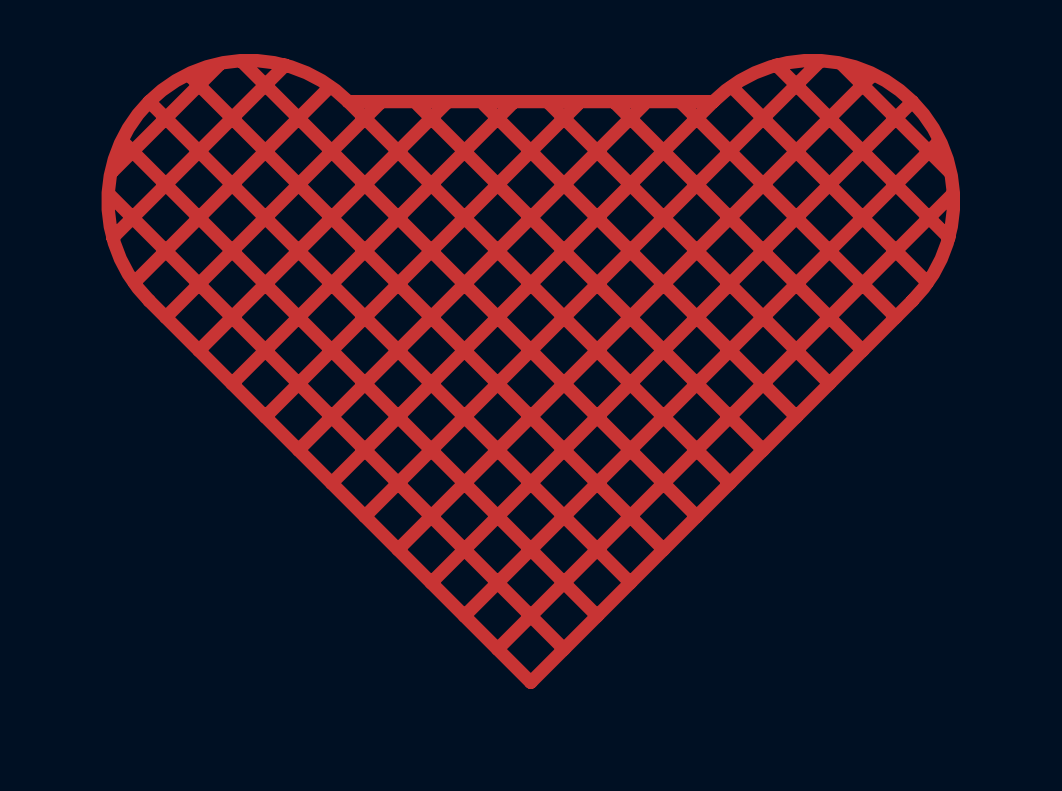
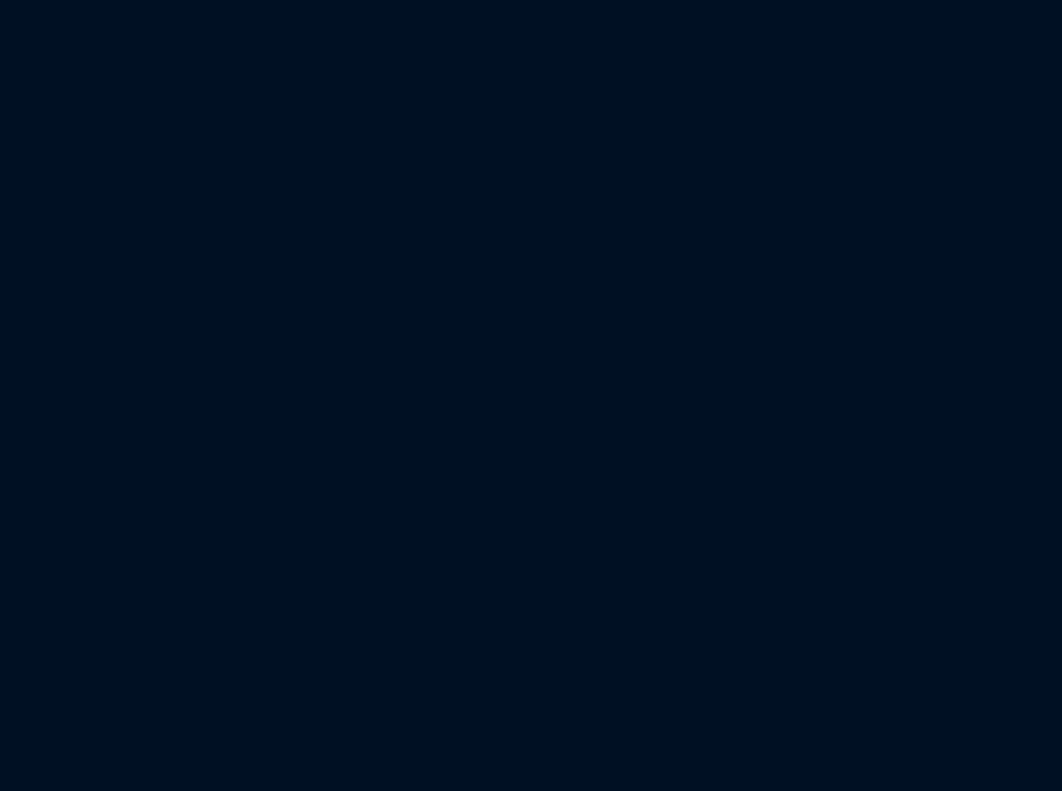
track: (242, 61) (696, 516) -> none
track: (819, 61) (364, 516) -> none
track: (218, 65) (112, 171) -> none
track: (285, 65) (112, 237) -> none
track: (776, 65) (948, 237) -> none
track: (842, 65) (948, 171) -> none
track: (189, 75) (663, 549) -> none
track: (872, 75) (398, 549) -> none
track: (329, 87) (134, 282) -> none
track: (731, 87) (927, 282) -> none
track: (149, 101) (630, 582) -> none
track: (348, 101) (713, 101) -> none
track: (348, 101) (729, 483) -> none
track: (348, 101) (321, 80) (290, 66) (274, 62) (257, 60) (223, 62) (206, 66) (175, 80) (161, 90) (137, 114) (120, 143) (110, 175) (108, 192) (110, 226) (114, 243) (128, 273) (149, 300) (530, 682) (912, 300) (933, 273) (947, 243) (951, 226) (953, 192) (951, 175) (941, 143) (923, 114) (899, 90) (885, 80) (854, 66) (838, 62) (821, 60) (787, 62) (770, 66) (740, 80) (713, 101) -> none
track: (381, 101) (165, 317) -> none
track: (447, 101) (198, 350) -> none
track: (514, 101) (232, 383) -> none
track: (547, 101) (829, 383) -> none
track: (613, 101) (862, 350) -> none
track: (680, 101) (895, 317) -> none
track: (713, 101) (331, 483) -> none
track: (912, 101) (431, 582) -> none
track: (417, 104) (763, 450) -> none
track: (484, 104) (796, 416) -> none
track: (577, 104) (265, 416) -> none
track: (643, 104) (298, 450) -> none
track: (122, 141) (597, 615) -> none
track: (938, 141) (464, 615) -> none
track: (109, 194) (563, 649) -> none
track: (952, 194) (497, 649) -> none

